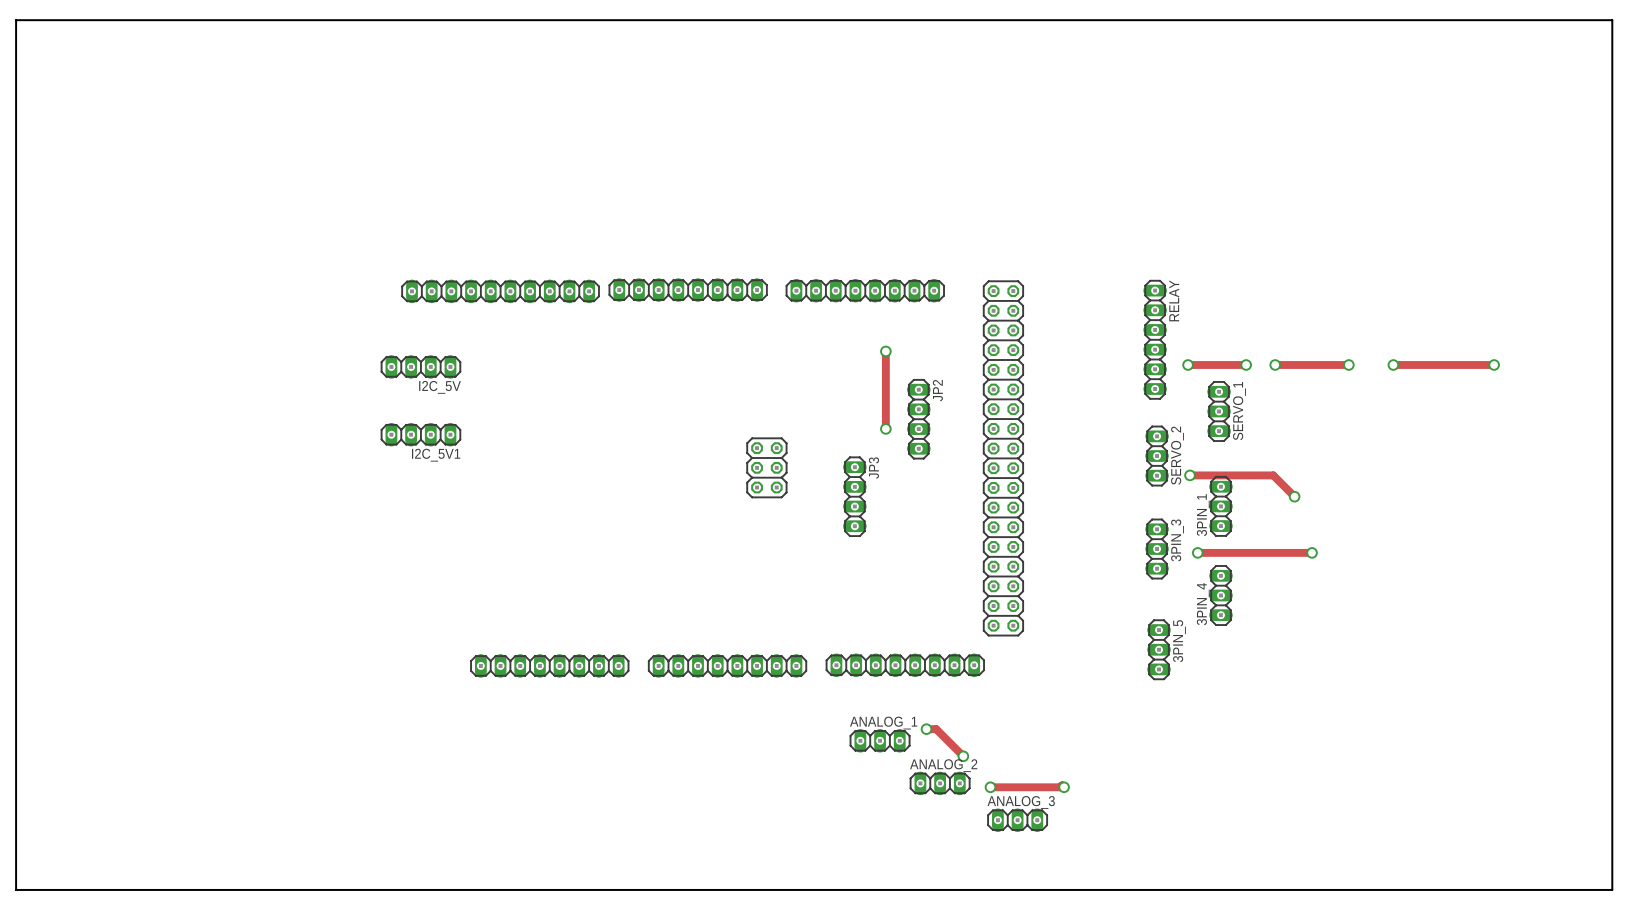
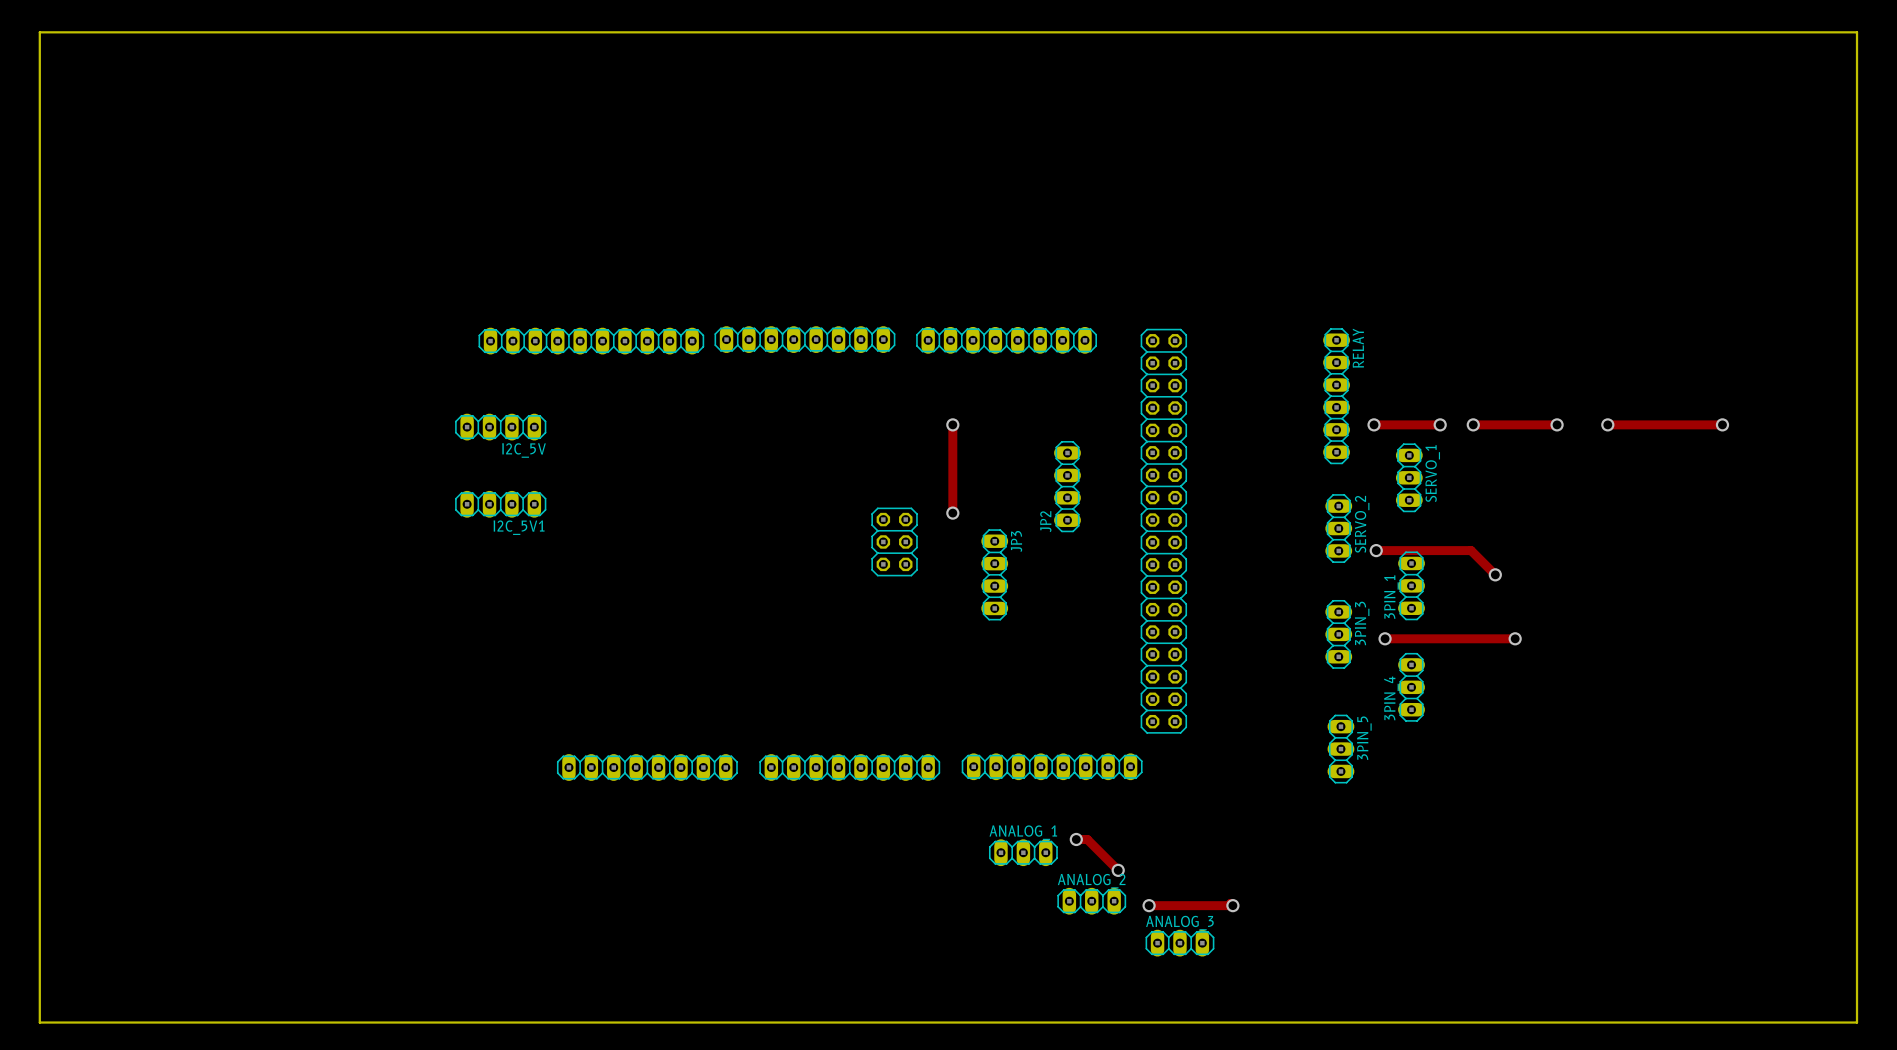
track: (885, 351) (885, 428) -> (952, 424) (952, 513)
via: (885, 351) -> none
via: none -> (952, 424)
JP2 name position: JP2 (937, 390) -> JP2 (1045, 521)
via: (885, 428) -> none
via: none -> (952, 513)

